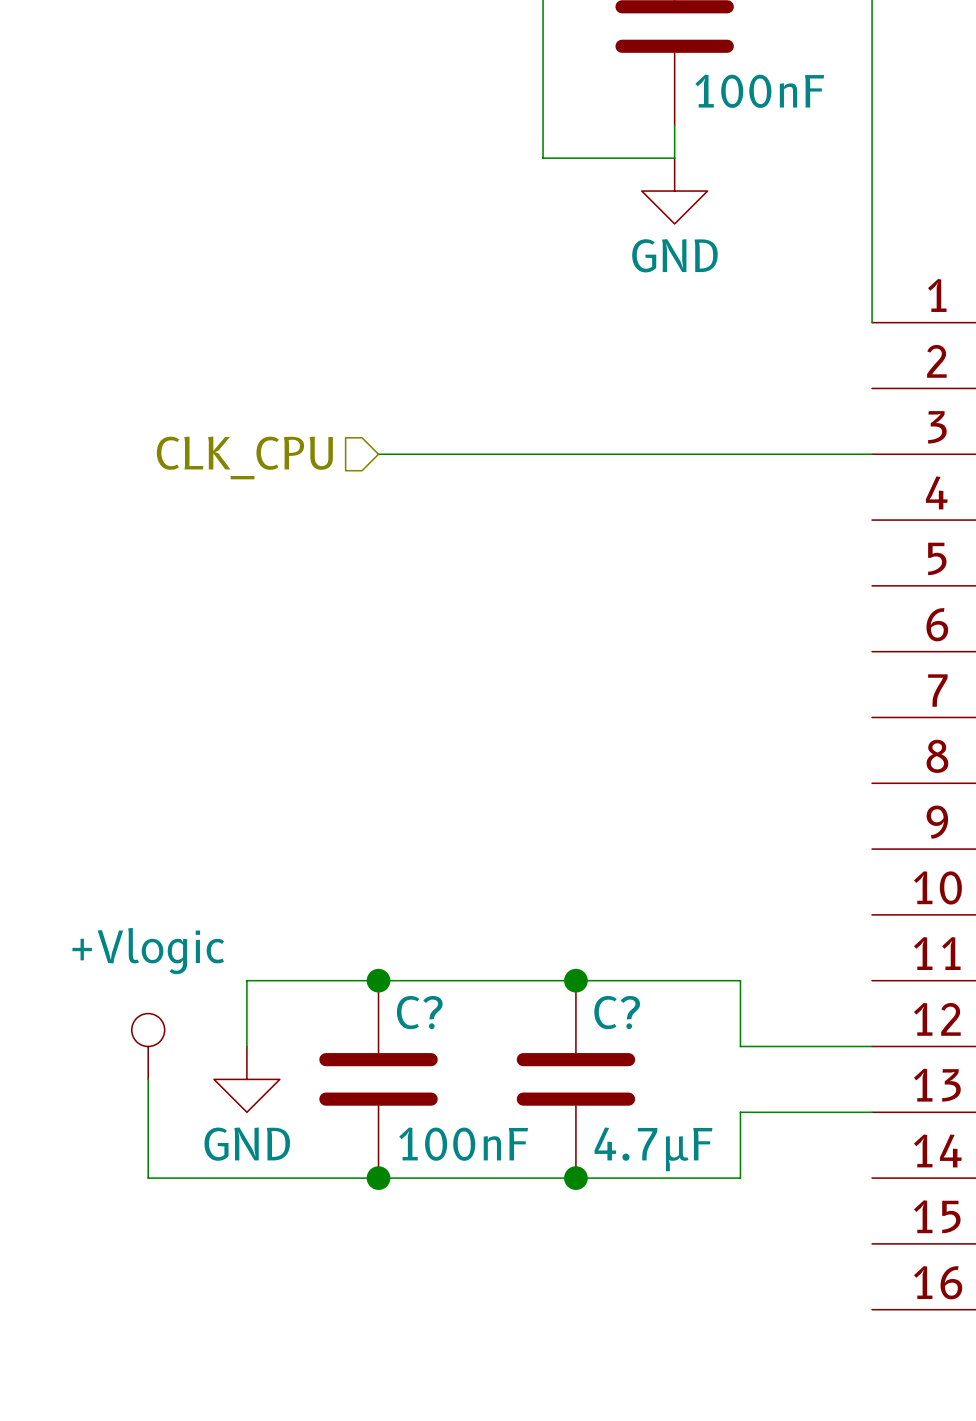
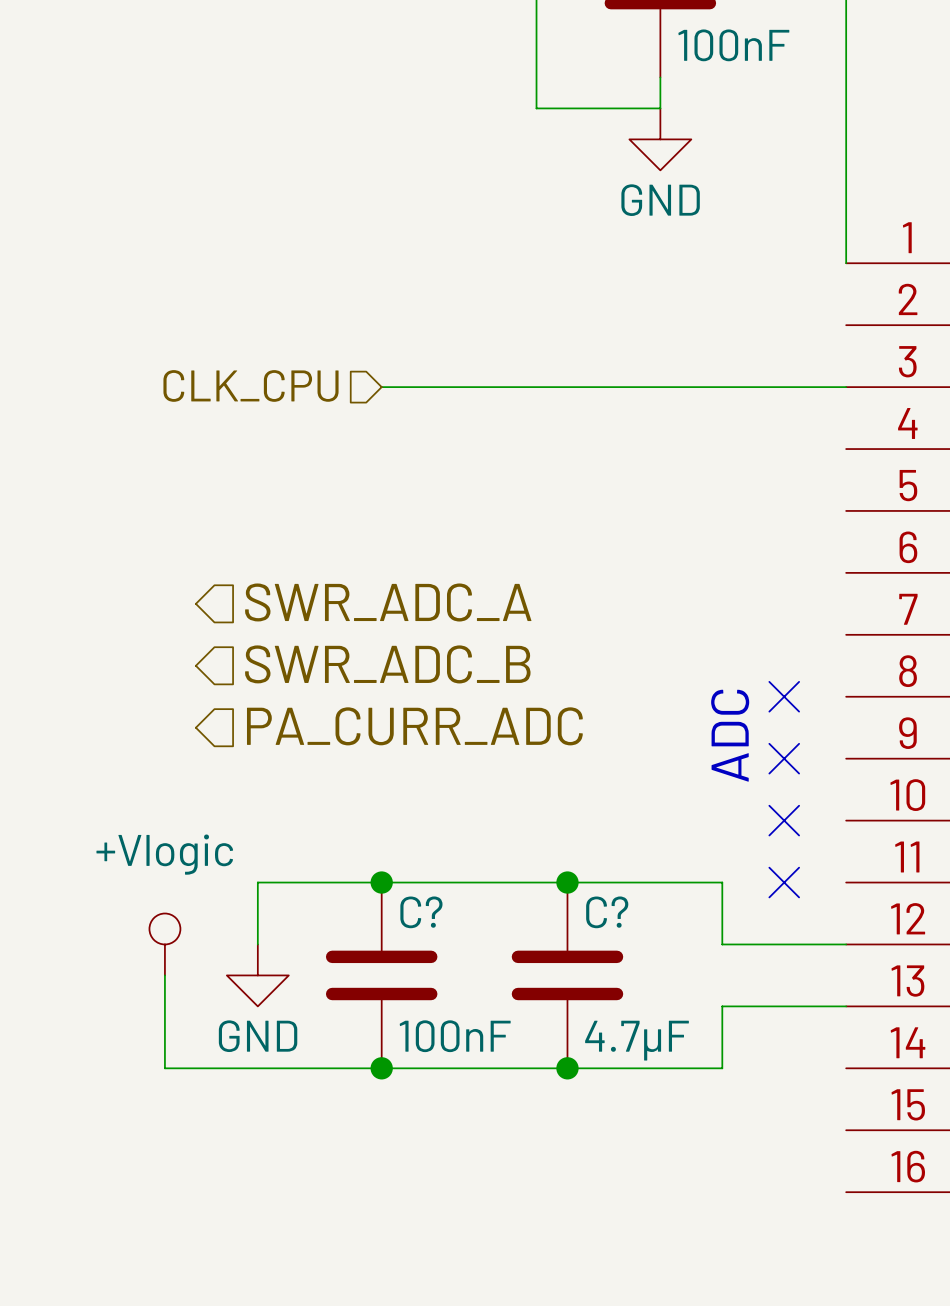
hierarchical label: none -> SWR_ADC_A (388, 602)
hierarchical label: none -> SWR_ADC_B (387, 664)
no-connect mark: none -> (784, 696)
hierarchical label: none -> PA_CURR_ADC (414, 726)
text: none -> ADC (730, 735)
no-connect mark: none -> (784, 758)
no-connect mark: none -> (784, 820)
no-connect mark: none -> (784, 882)

